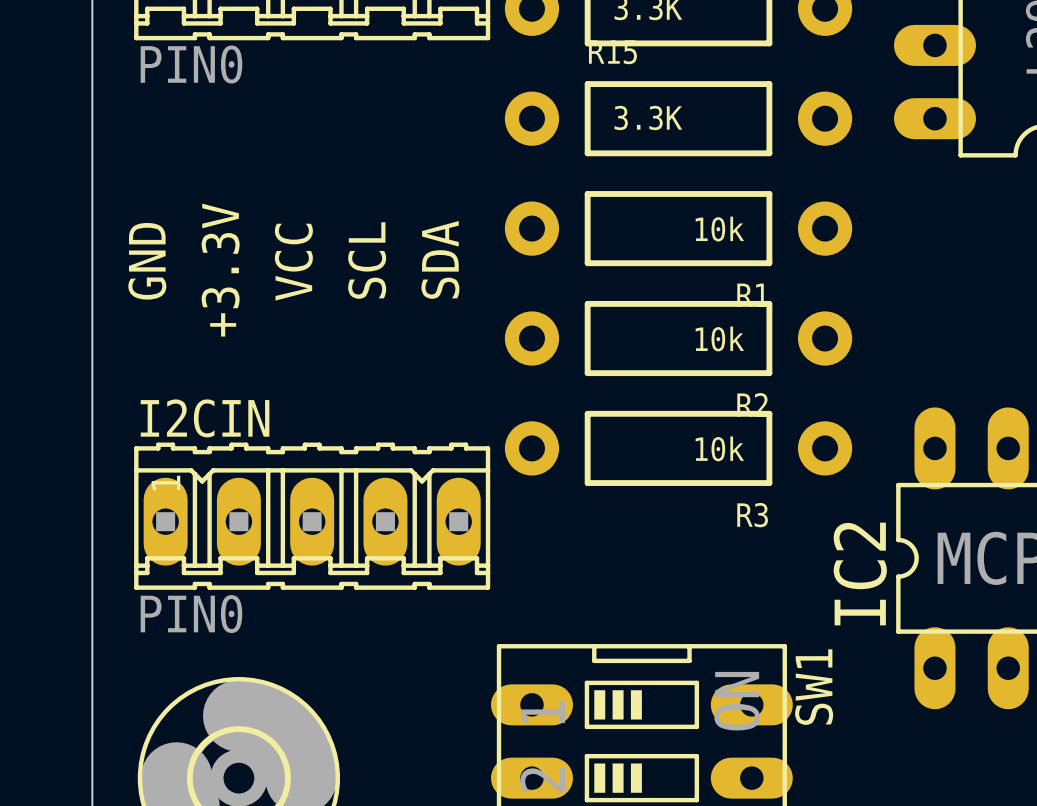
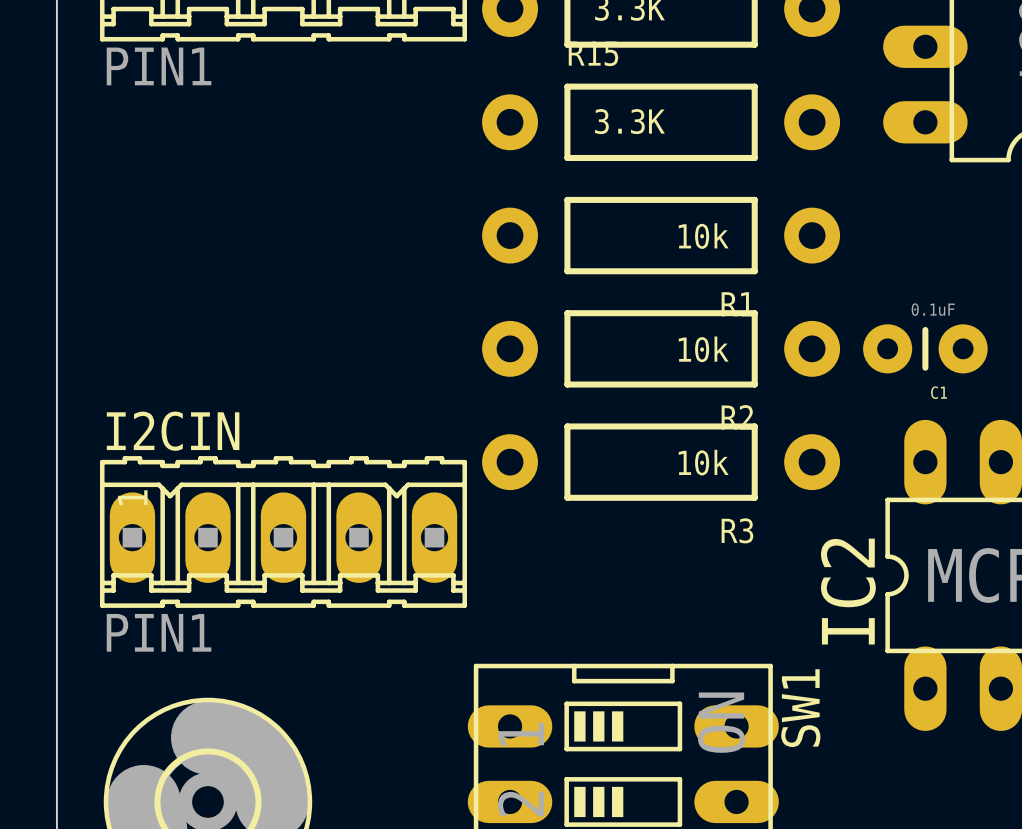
part value: PIN0 (191, 64) -> PIN1 (159, 66)
text: SDA (440, 259) -> none
text: SCL (367, 260) -> none
text: GND (147, 261) -> none
text: VCC (293, 262) -> none
text: +3.3V (220, 270) -> none
C1: none -> 0.1uF (925, 348)
I2CIN value: PIN0 (191, 614) -> PIN1 (159, 632)

